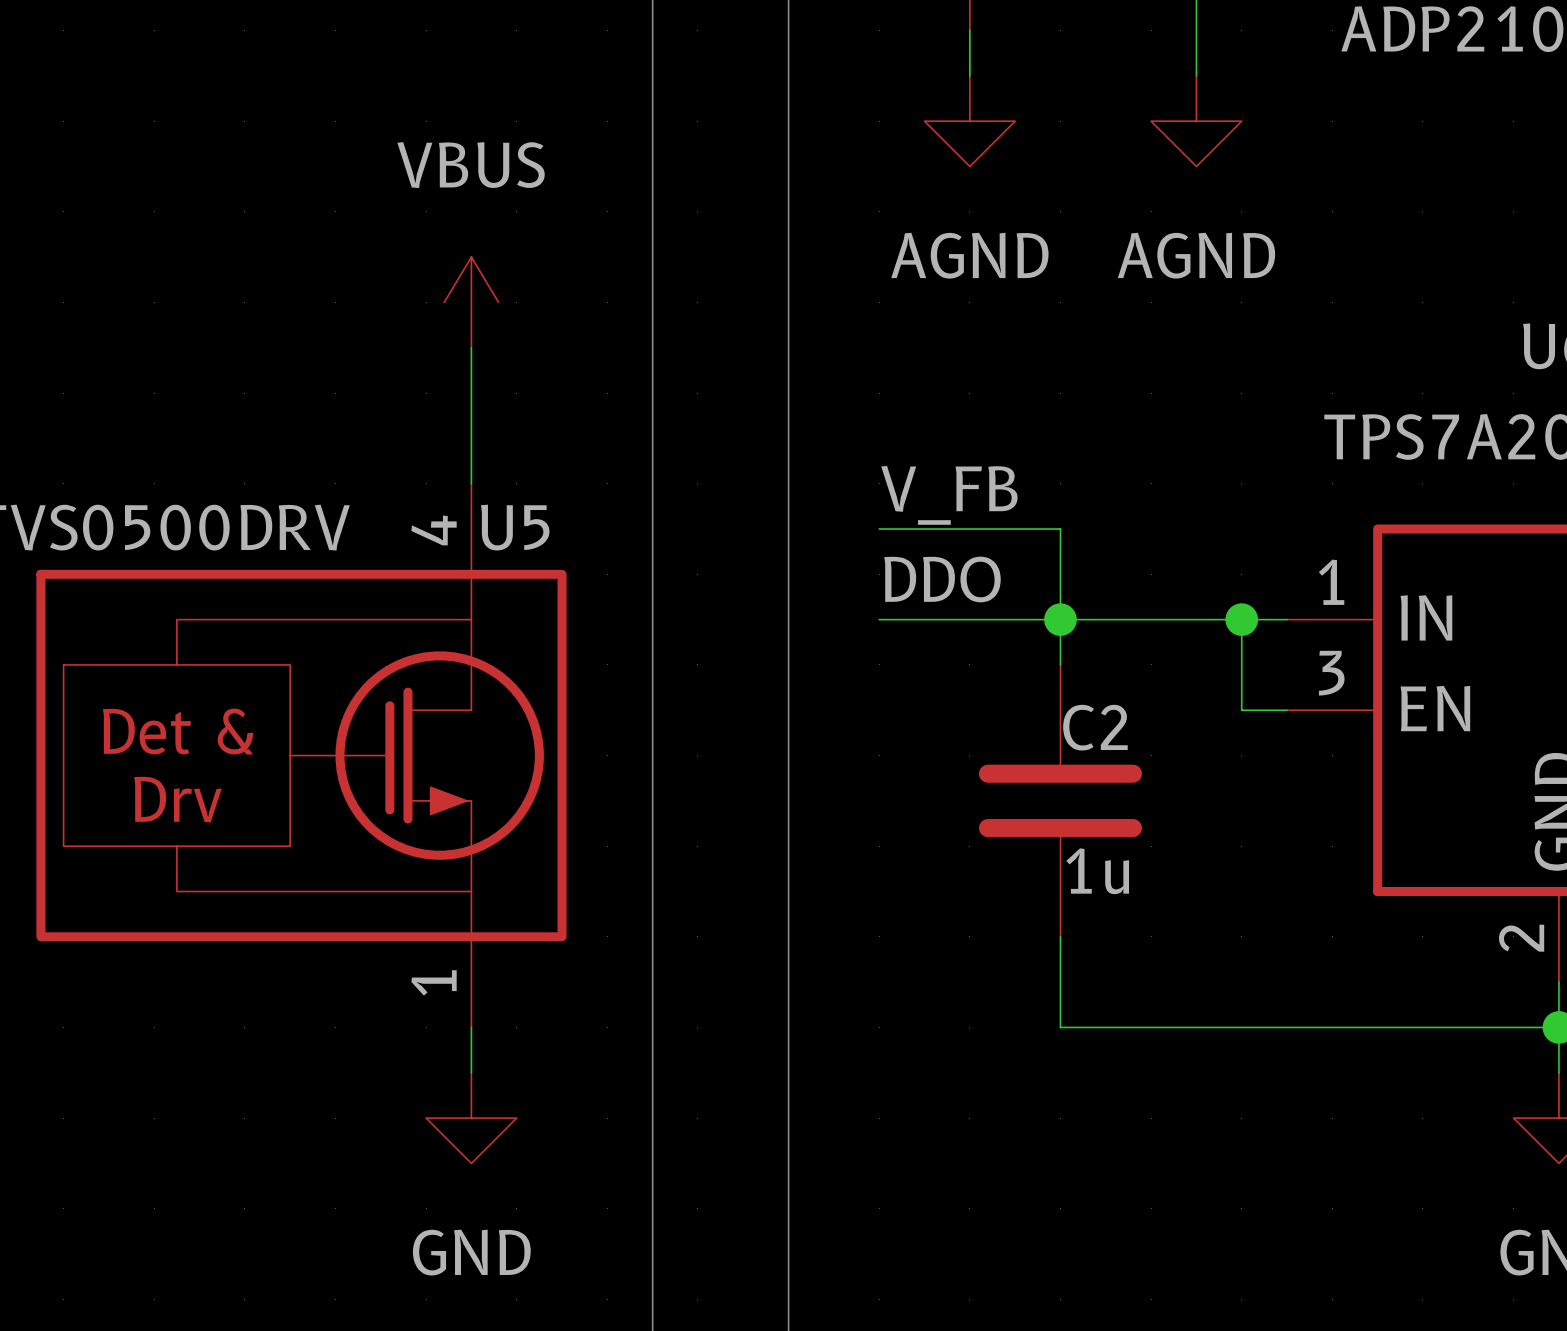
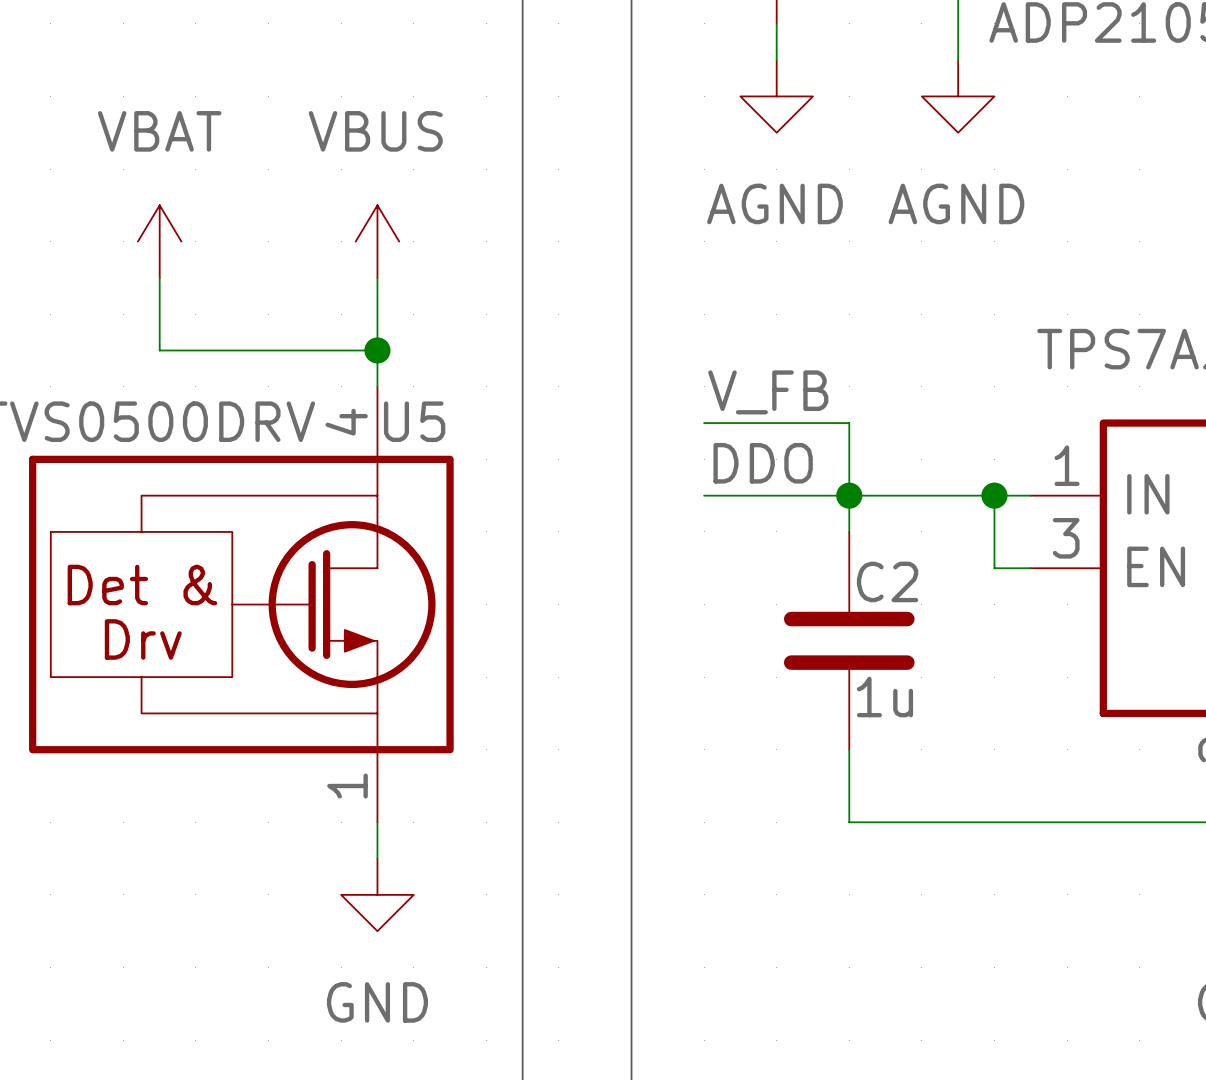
power symbol: none -> VBAT (159, 241)
wire: none -> (159, 277) (159, 350) (377, 350)
junction: none -> (377, 350)

